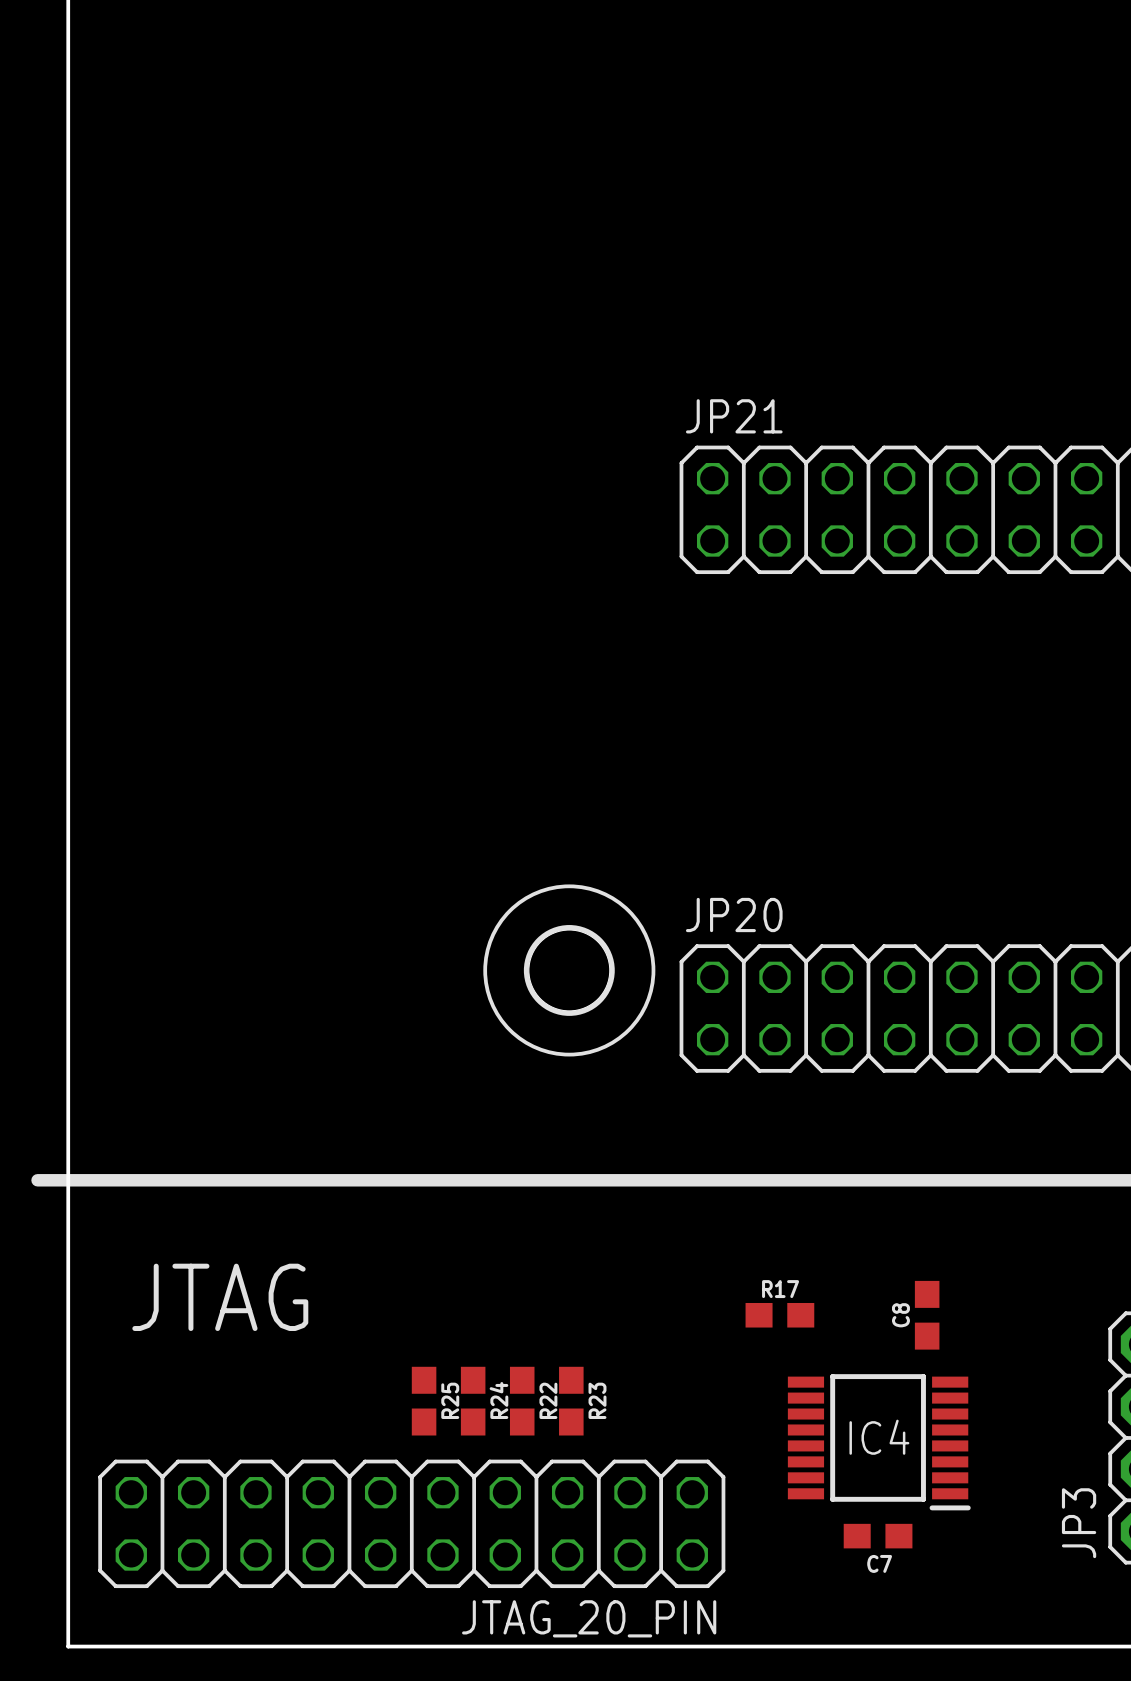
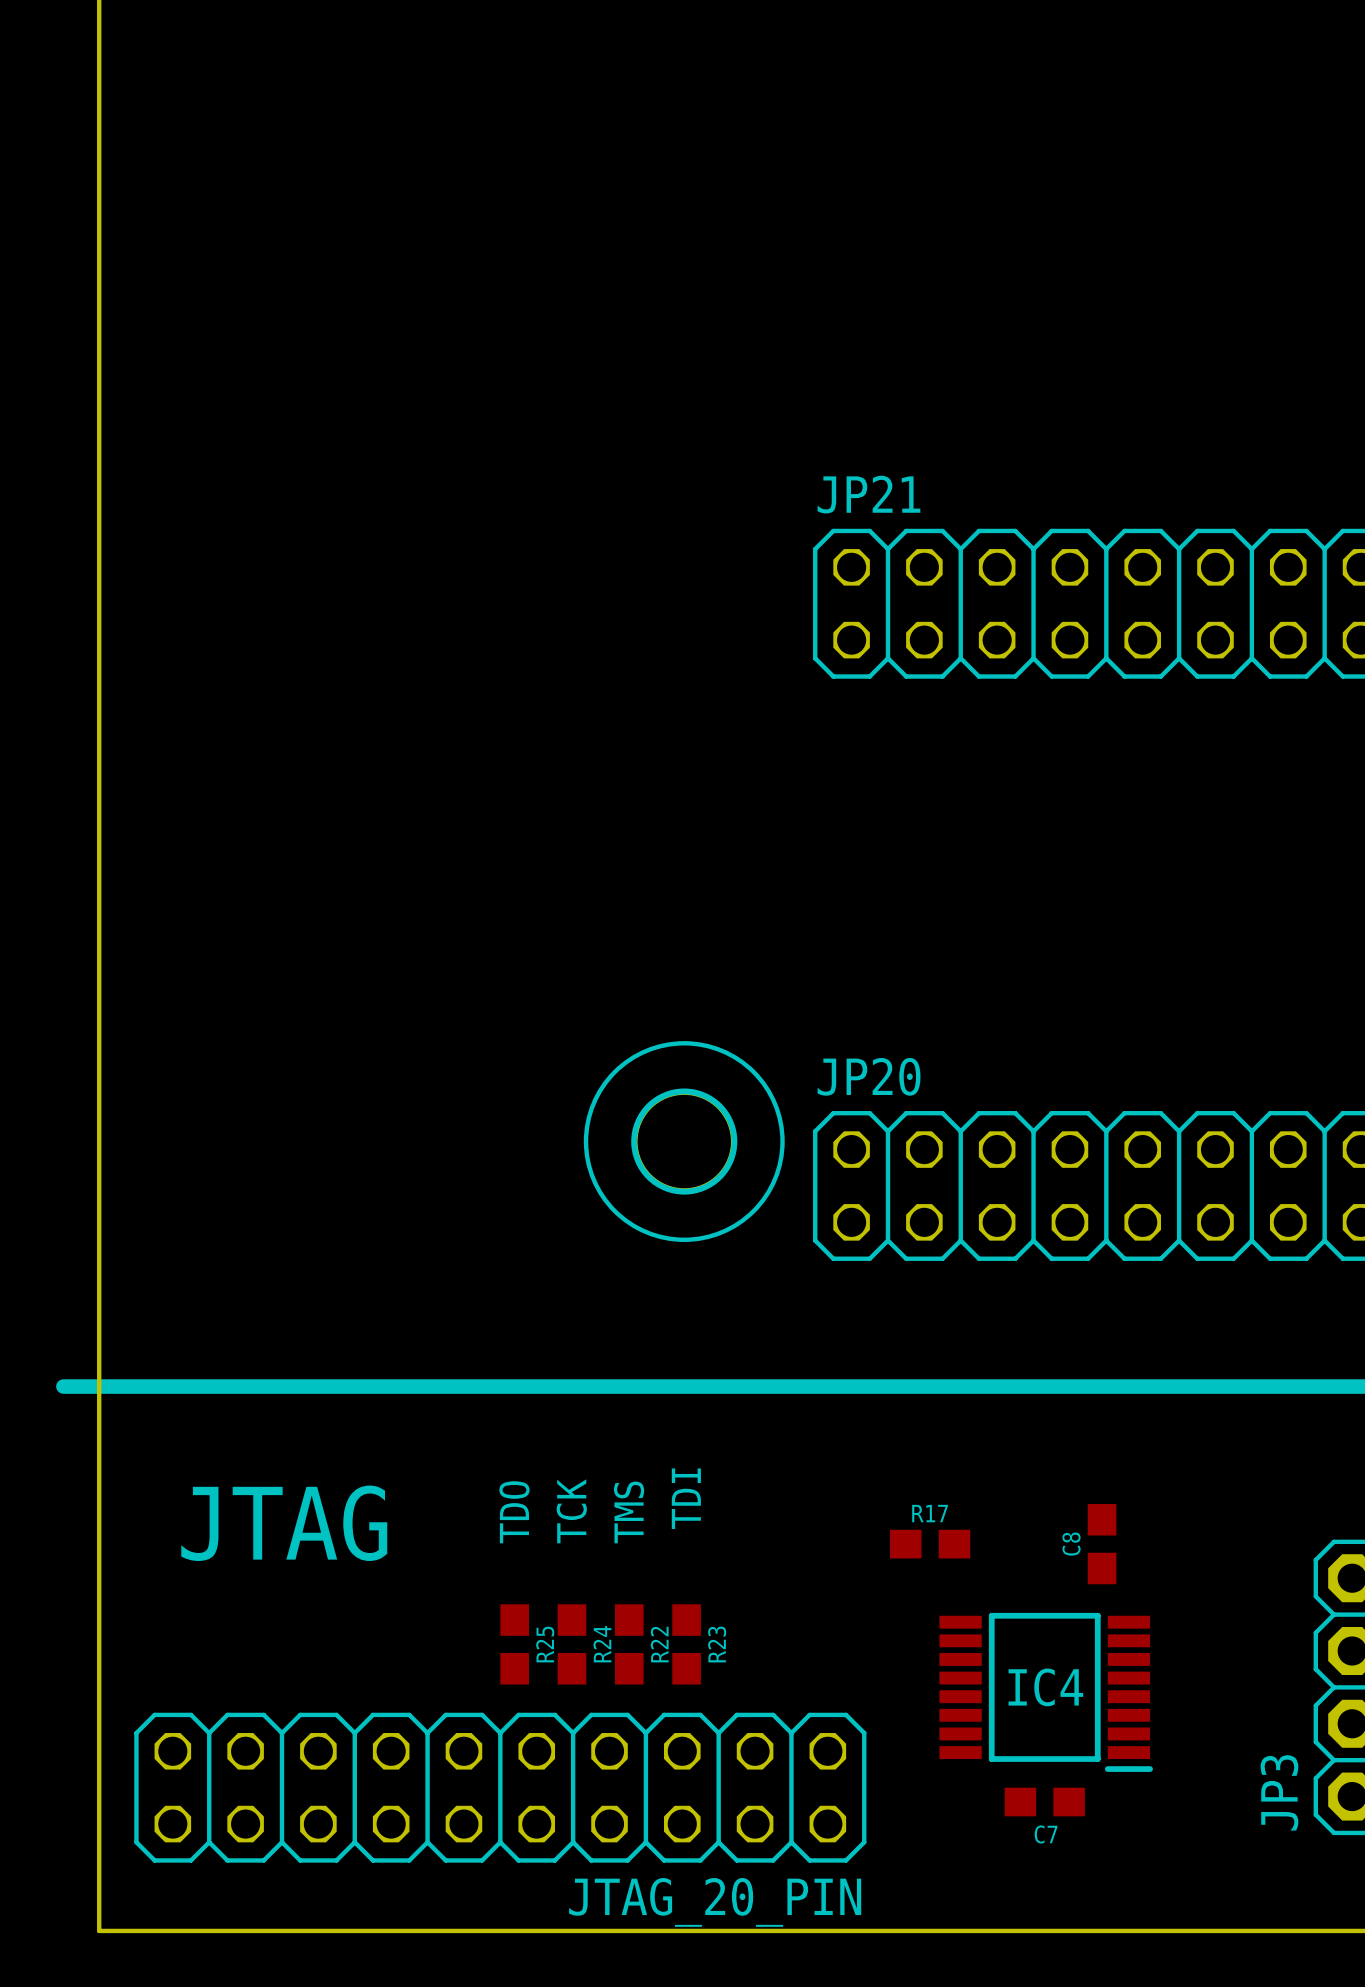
text: none -> TDI (686, 1498)
text: none -> TMS (629, 1512)
text: none -> TDO (514, 1512)
text: none -> TCK (571, 1511)

